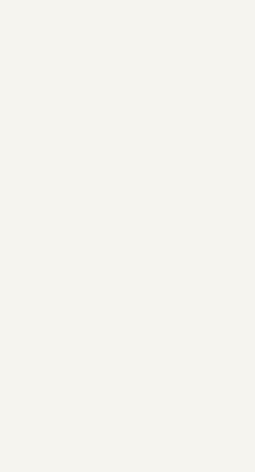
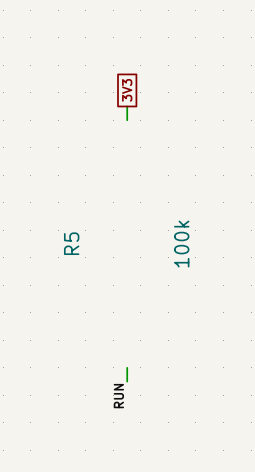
global label: none -> 3V3 (127, 90)
wire: none -> (127, 106) (127, 120)
R5: none -> 100k (126, 244)
wire: none -> (127, 367) (127, 381)
label: none -> RUN (118, 396)

